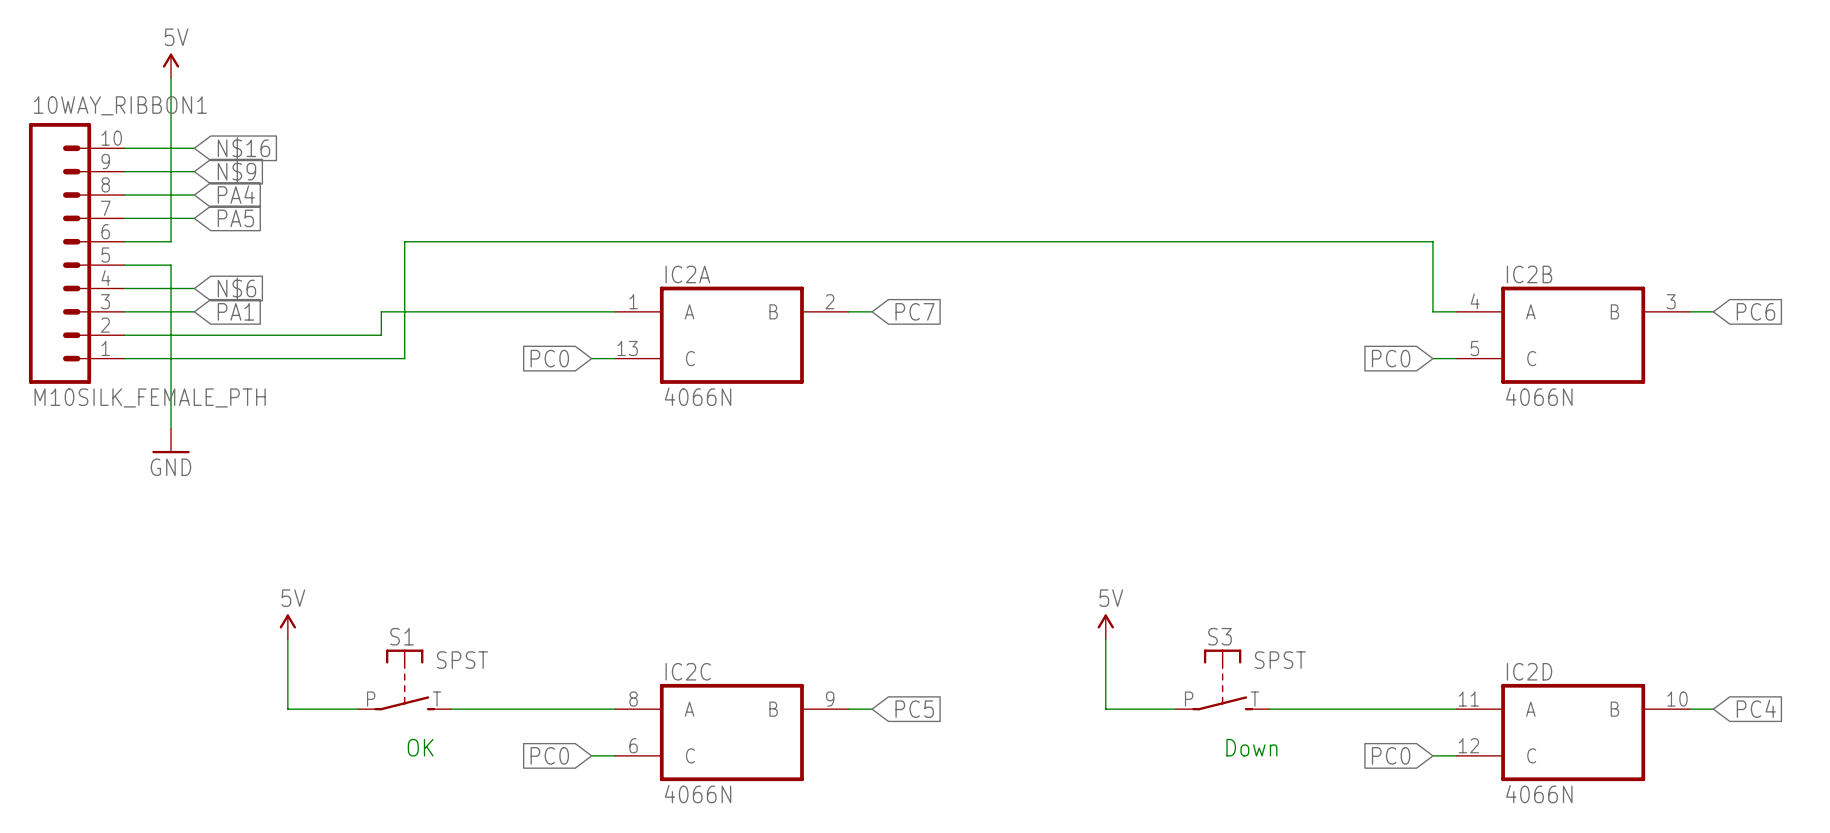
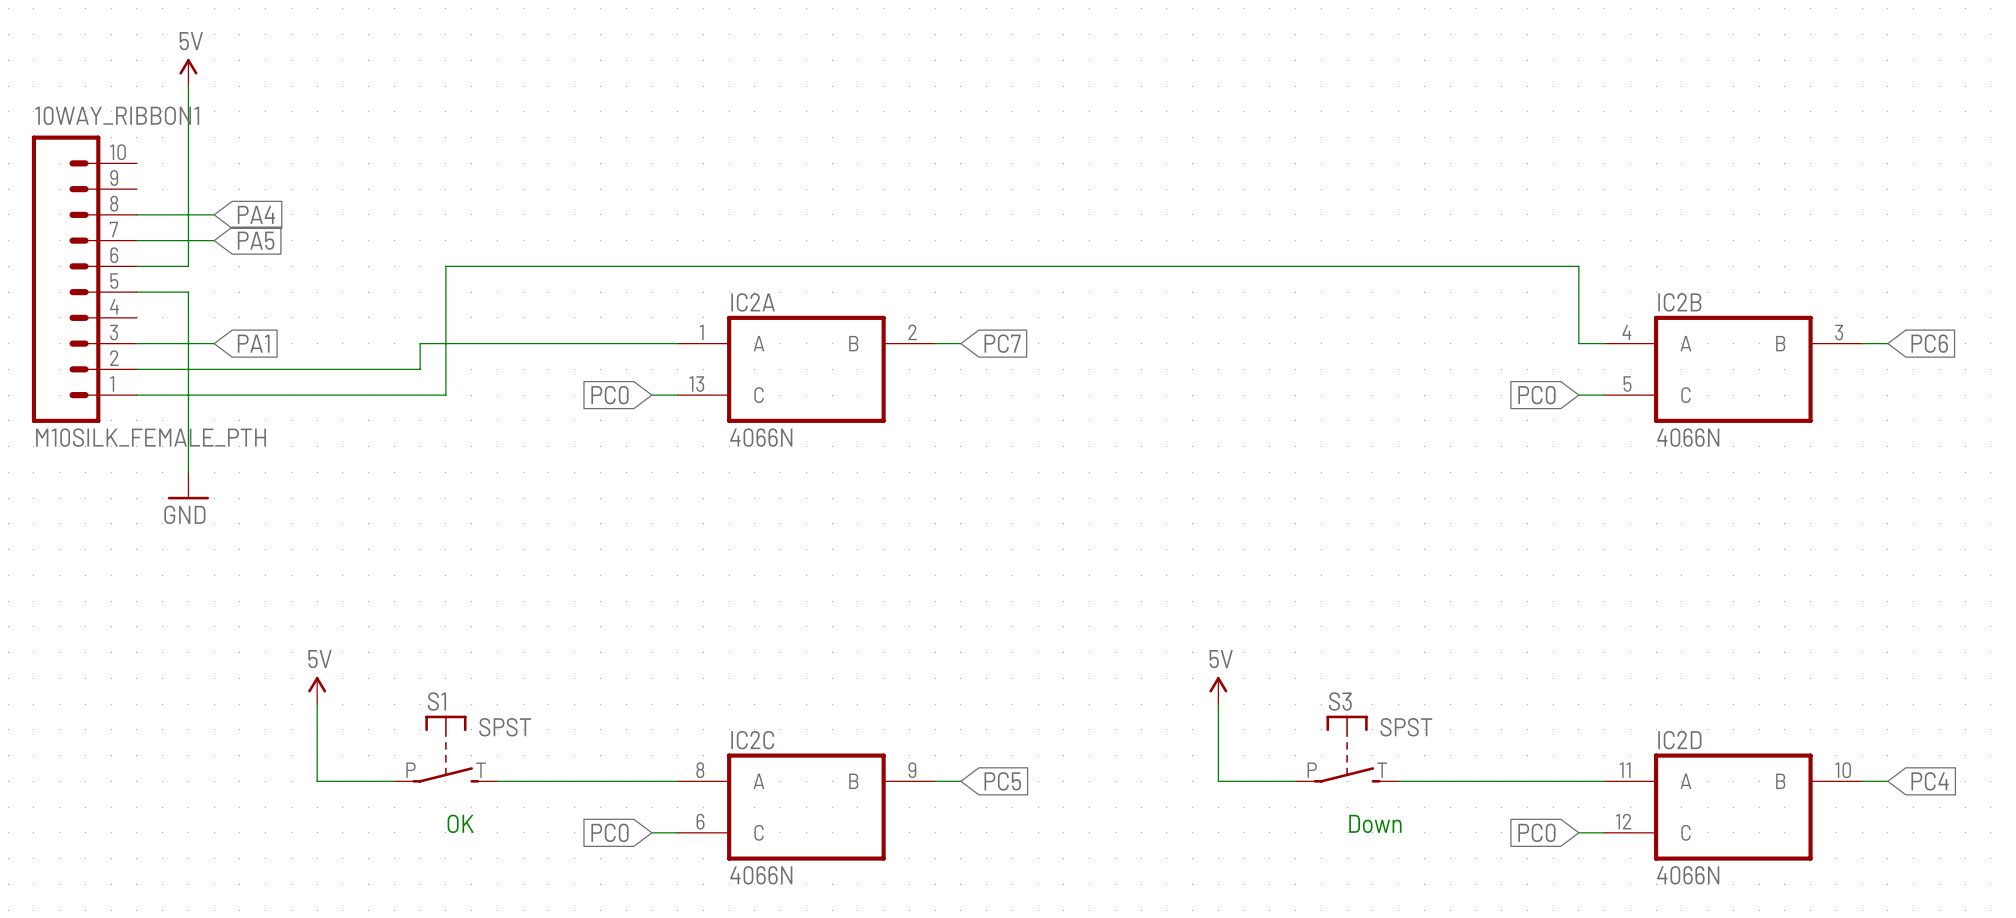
wire: (124, 148) (194, 148) -> none
global label: N$16 (243, 148) -> none
wire: (124, 171) (194, 171) -> none
global label: N$9 (236, 171) -> none
wire: (124, 288) (194, 288) -> none
global label: N$6 (236, 288) -> none

